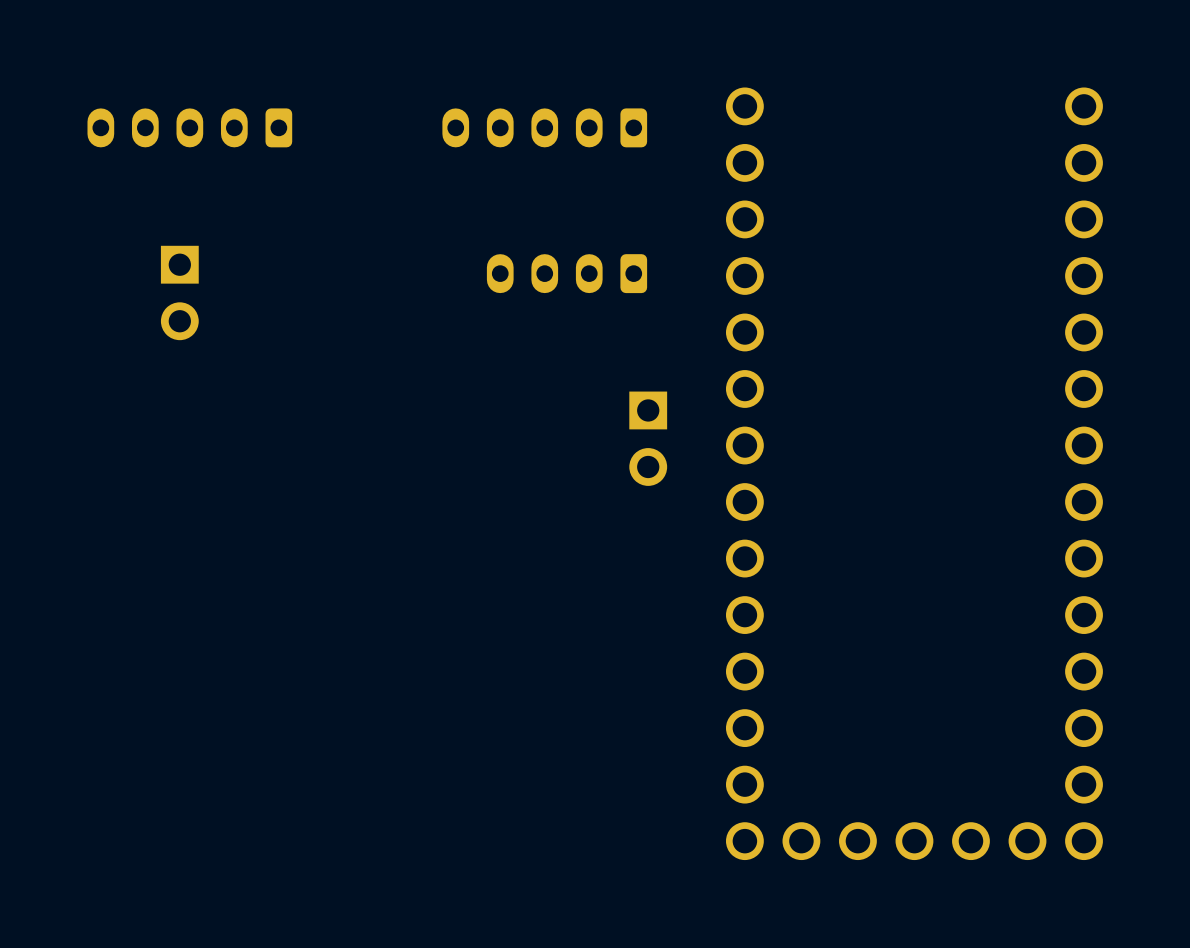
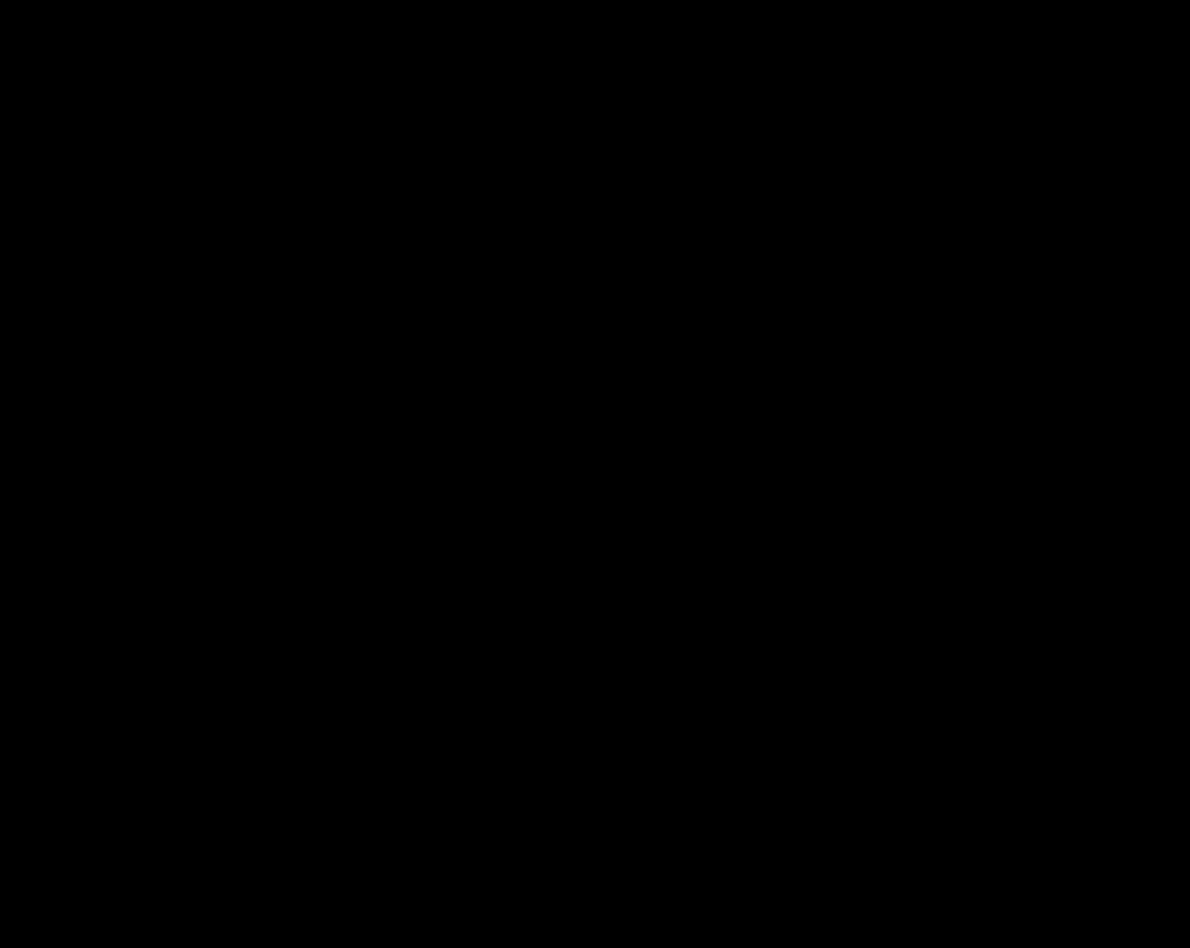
part: (189, 127) -> none
part: (544, 127) -> none
part: (567, 273) -> none
part: (179, 292) -> none
part: (648, 438) -> none
part: (914, 473) -> none

